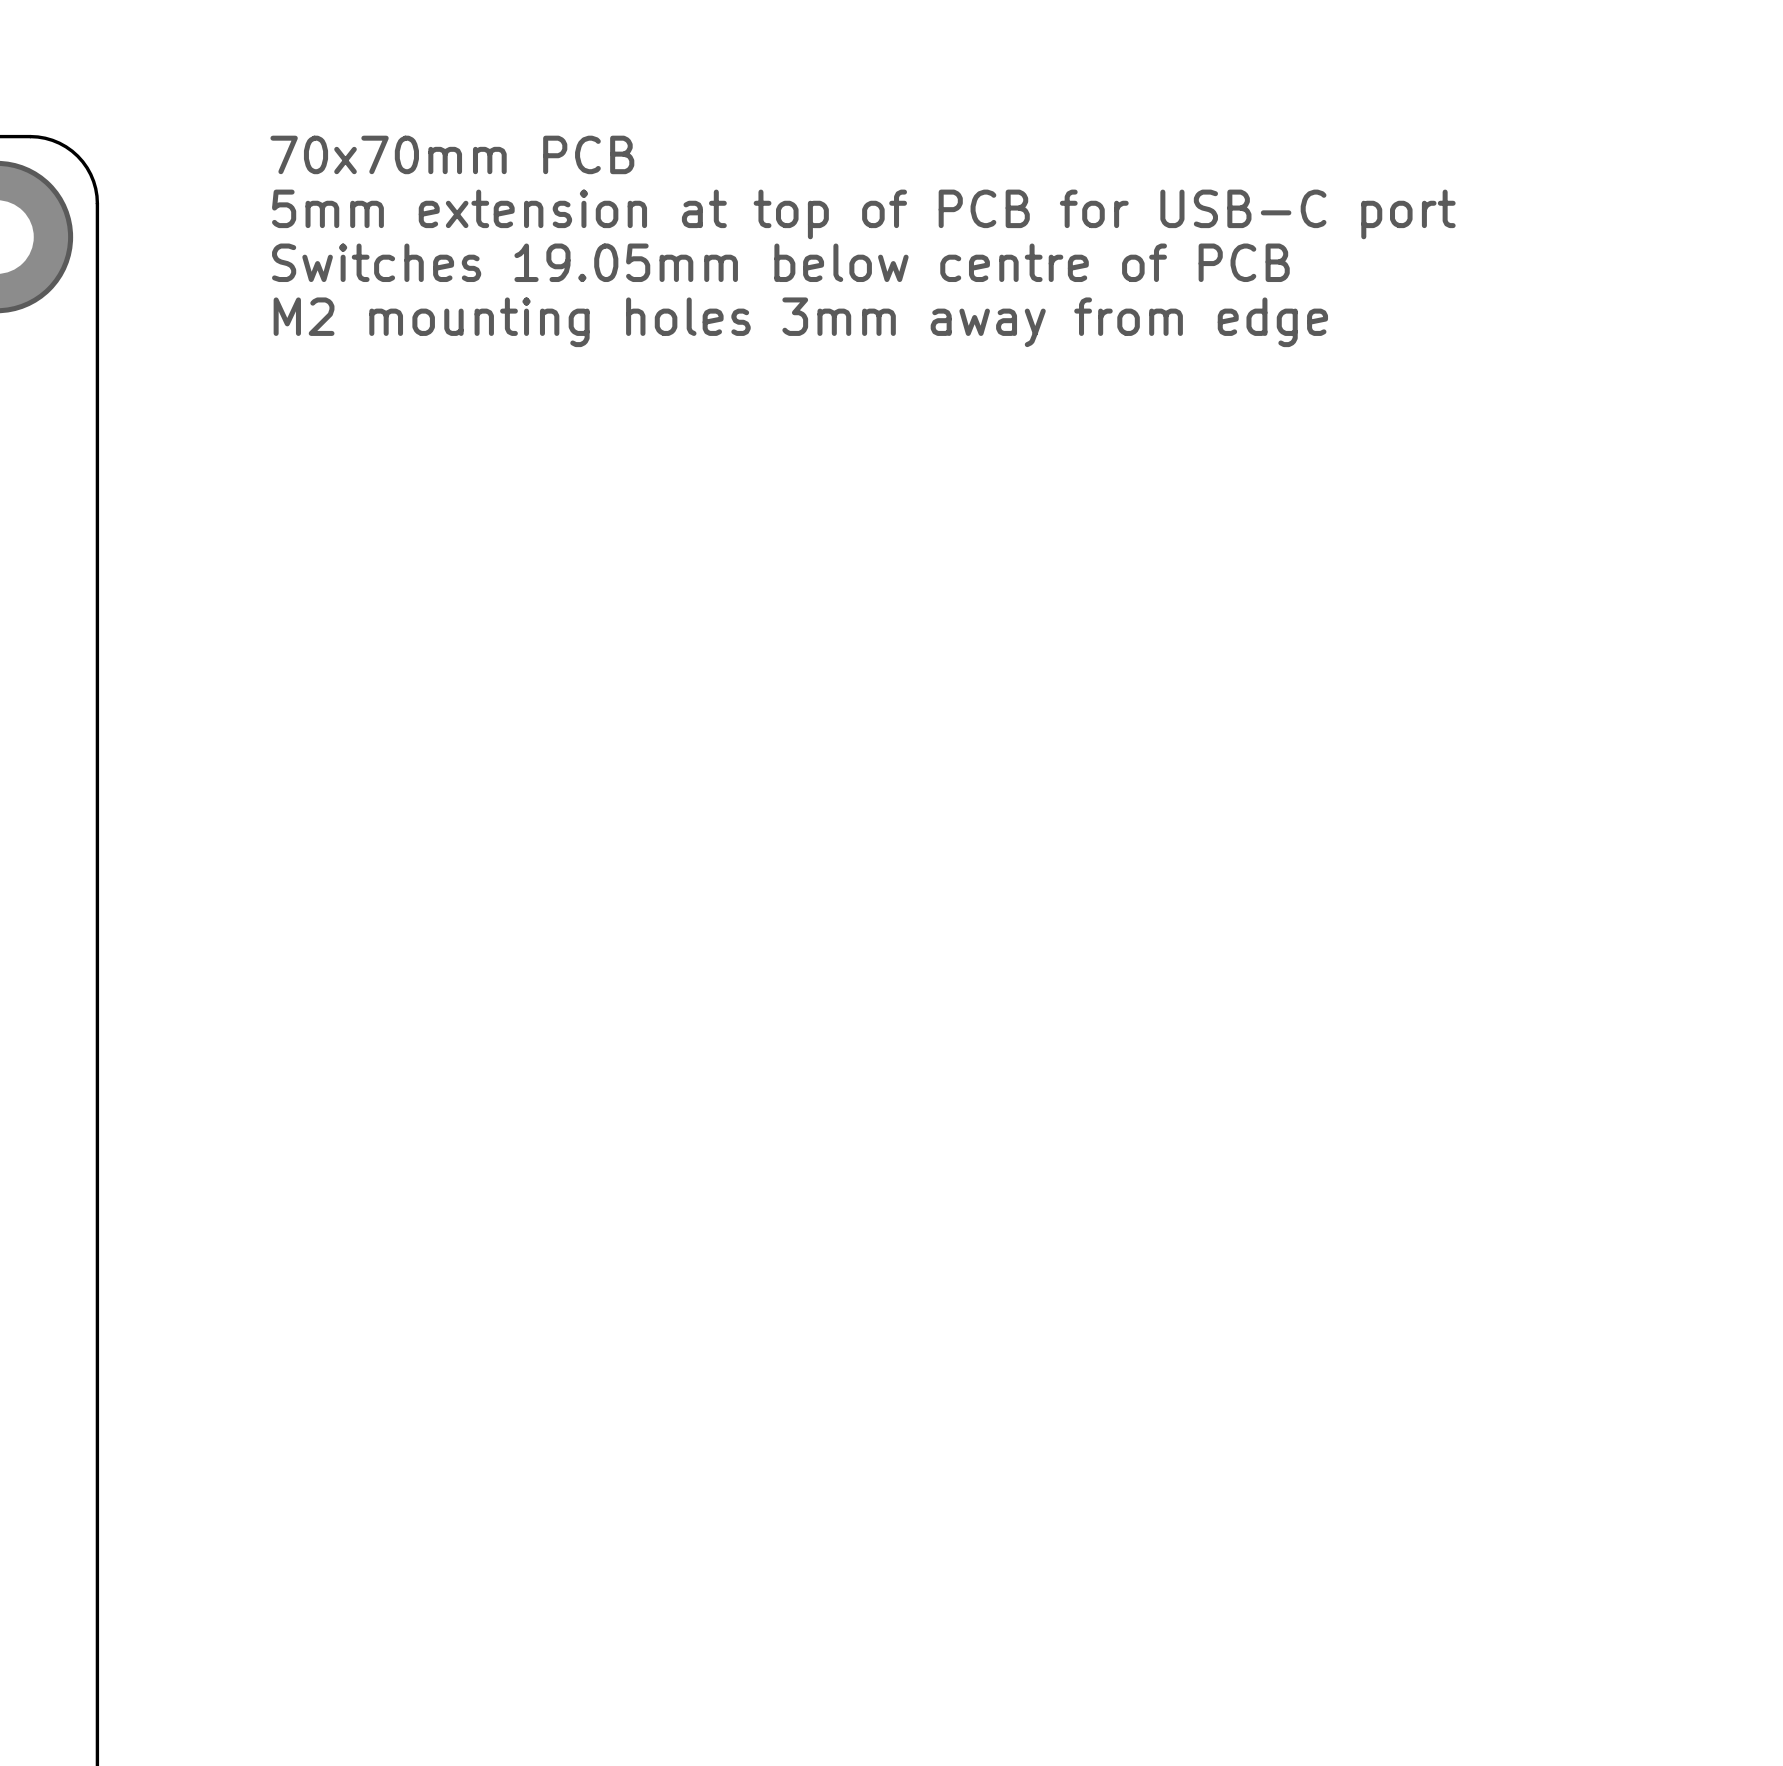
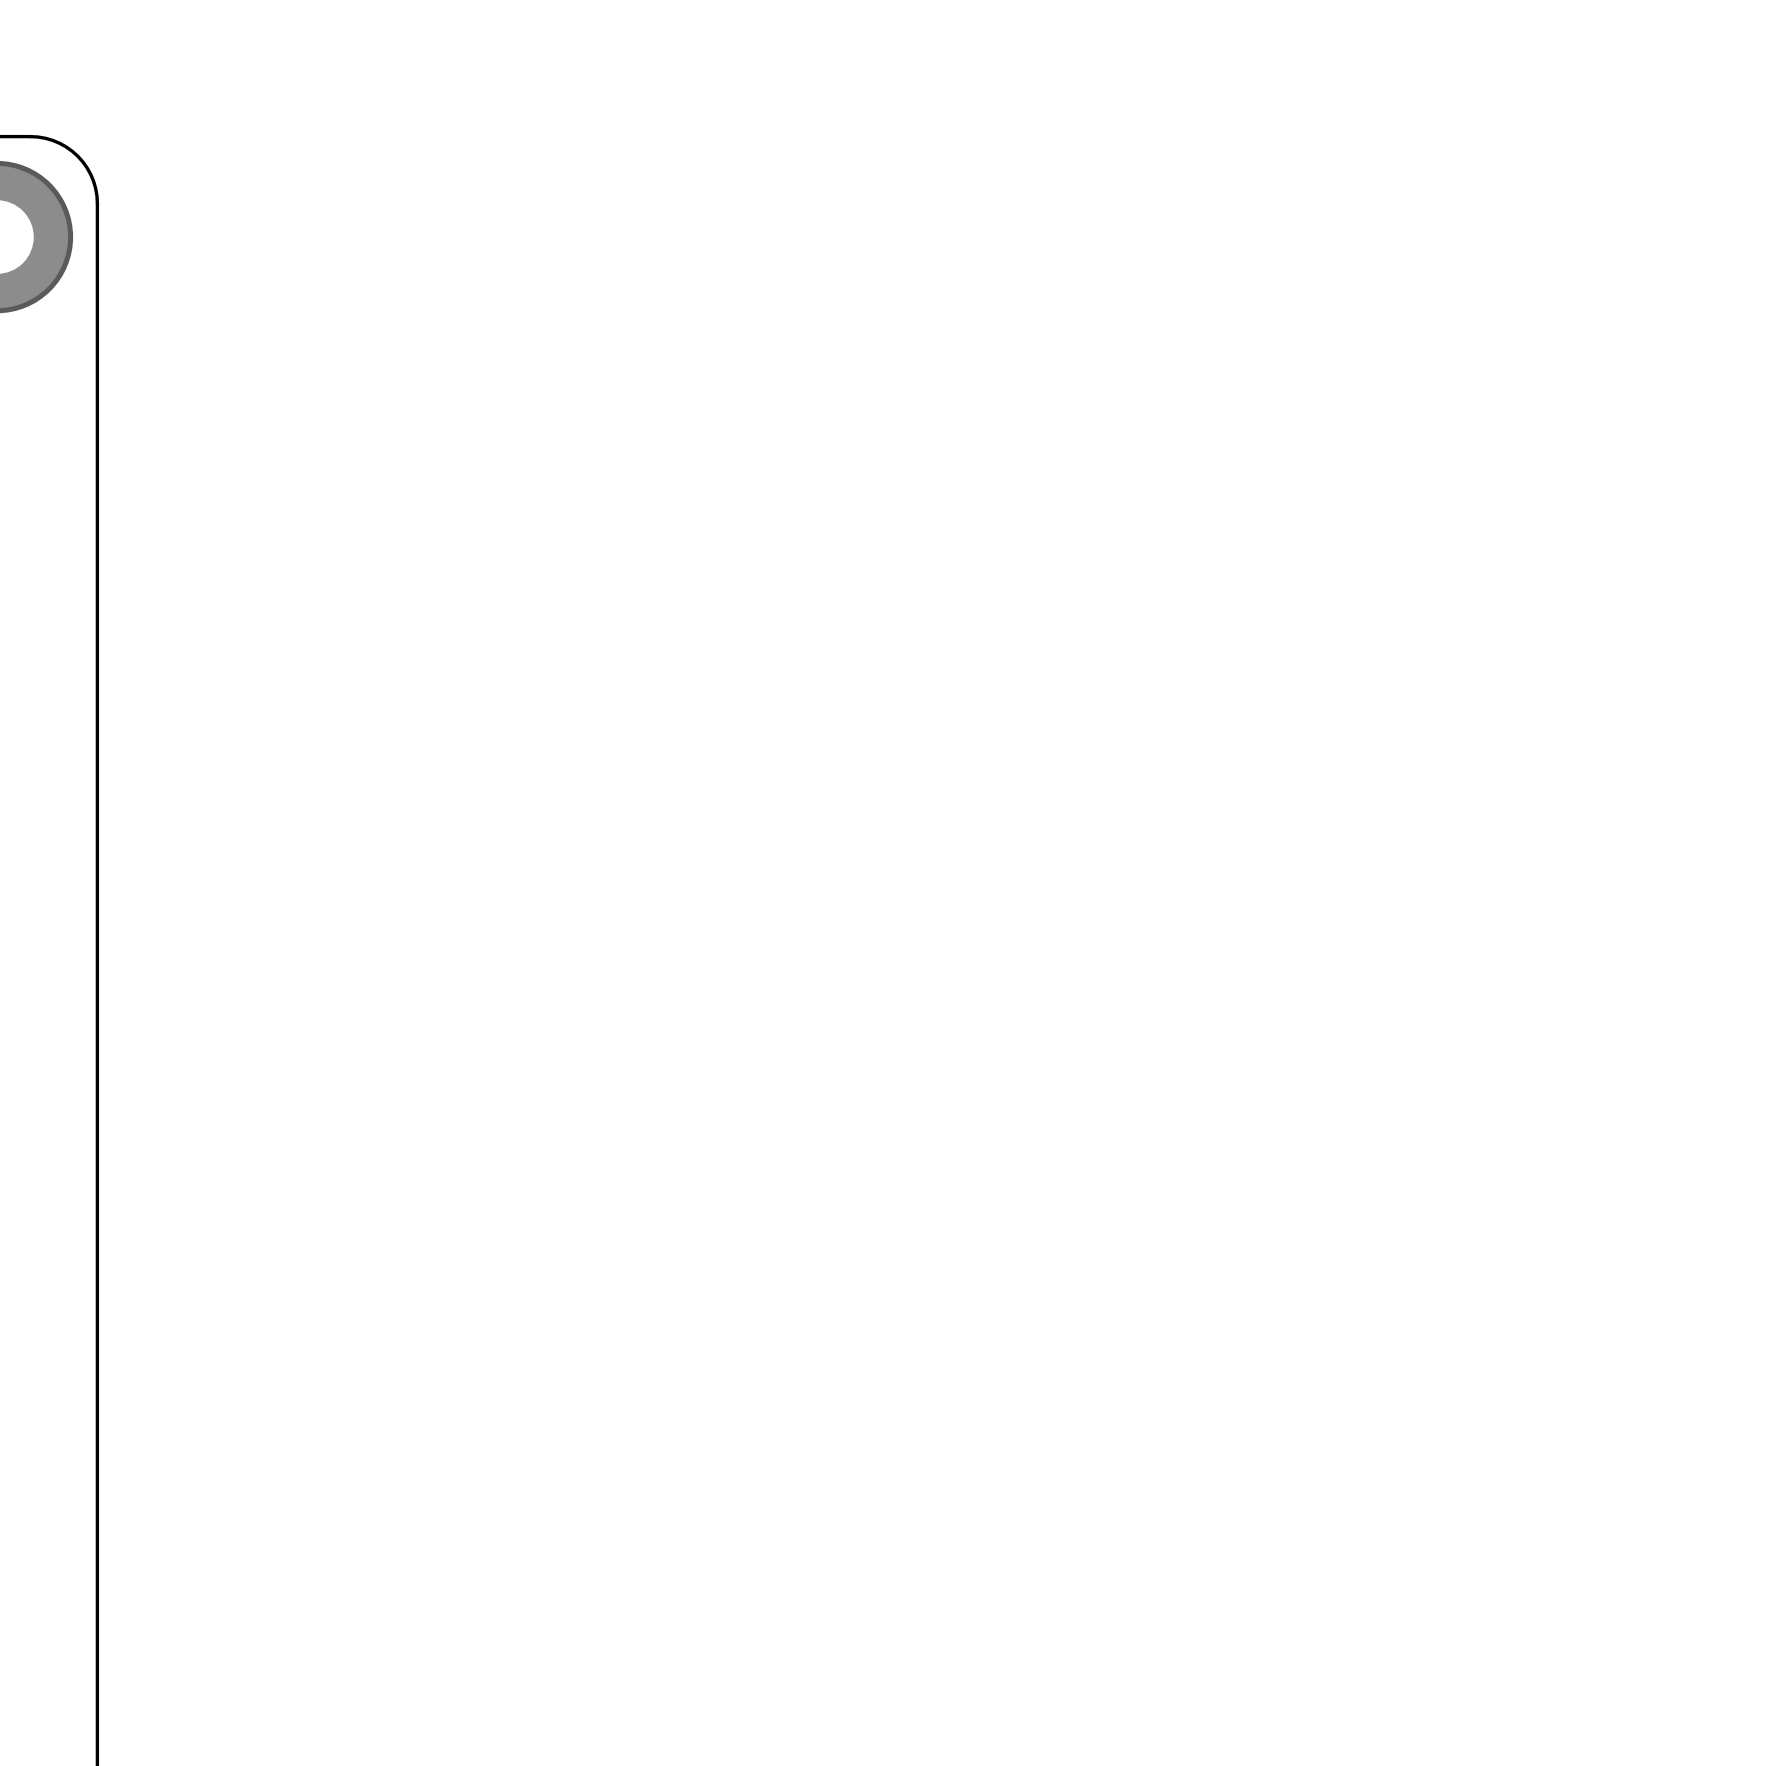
text: 70x70mm PCB (452, 154) -> none
text: 5mm extension at top of PCB for USB-C port (863, 214) -> none
text: Switches 19.05mm below centre of PCB (780, 262) -> none
text: M2 mounting holes 3mm away from edge (800, 322) -> none

